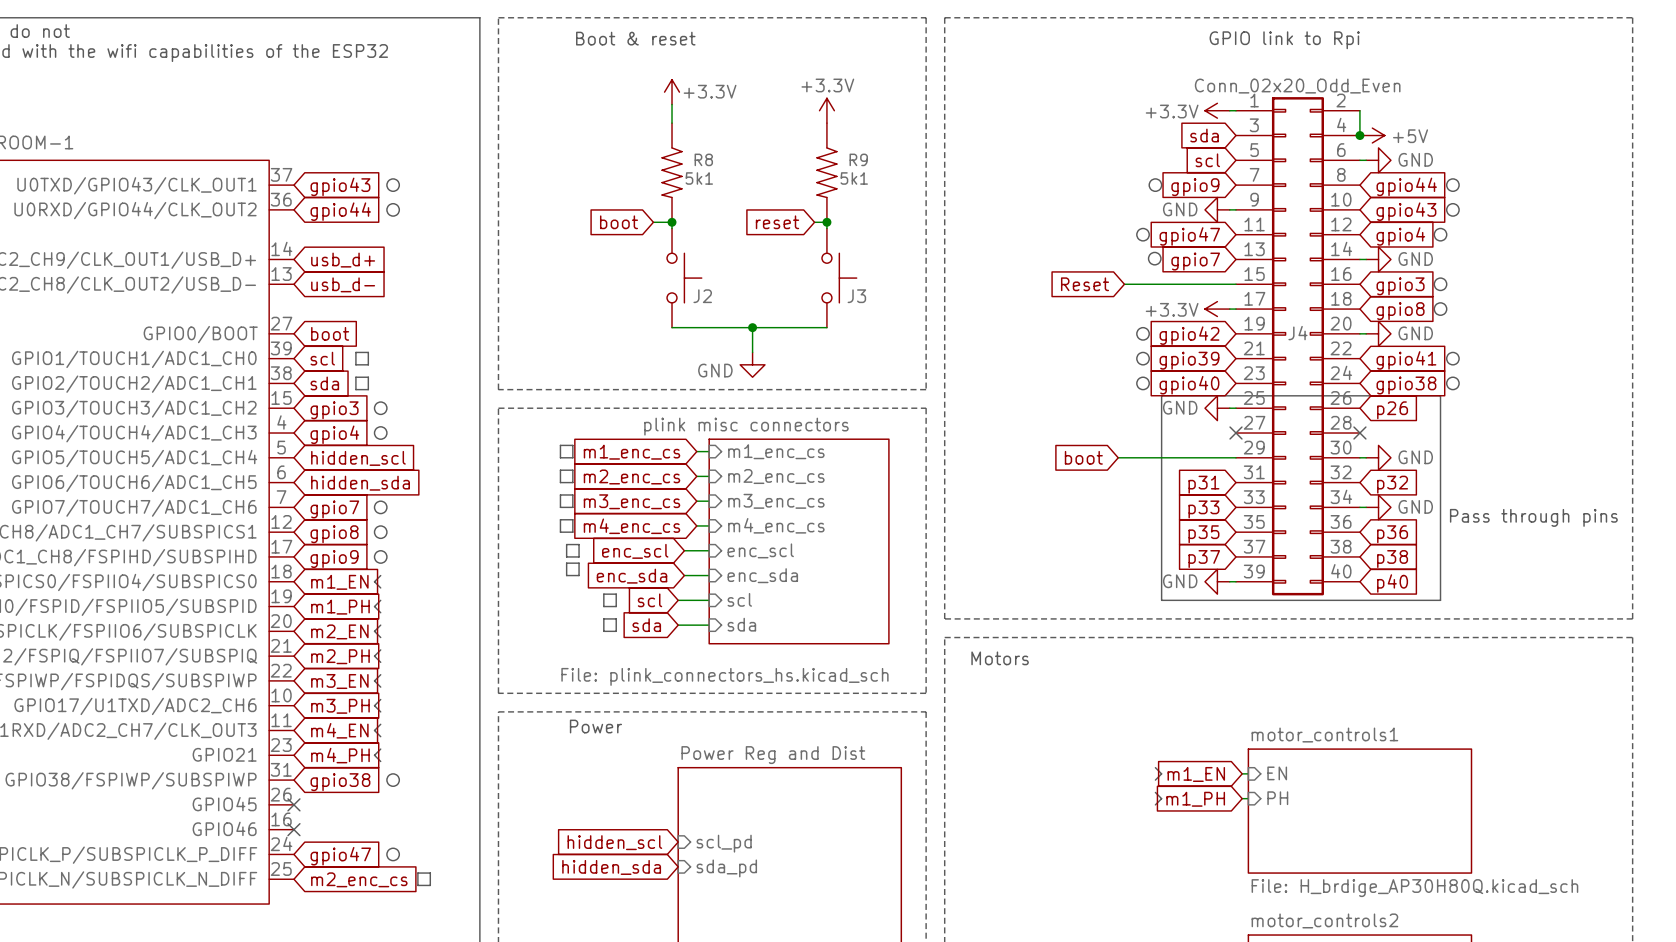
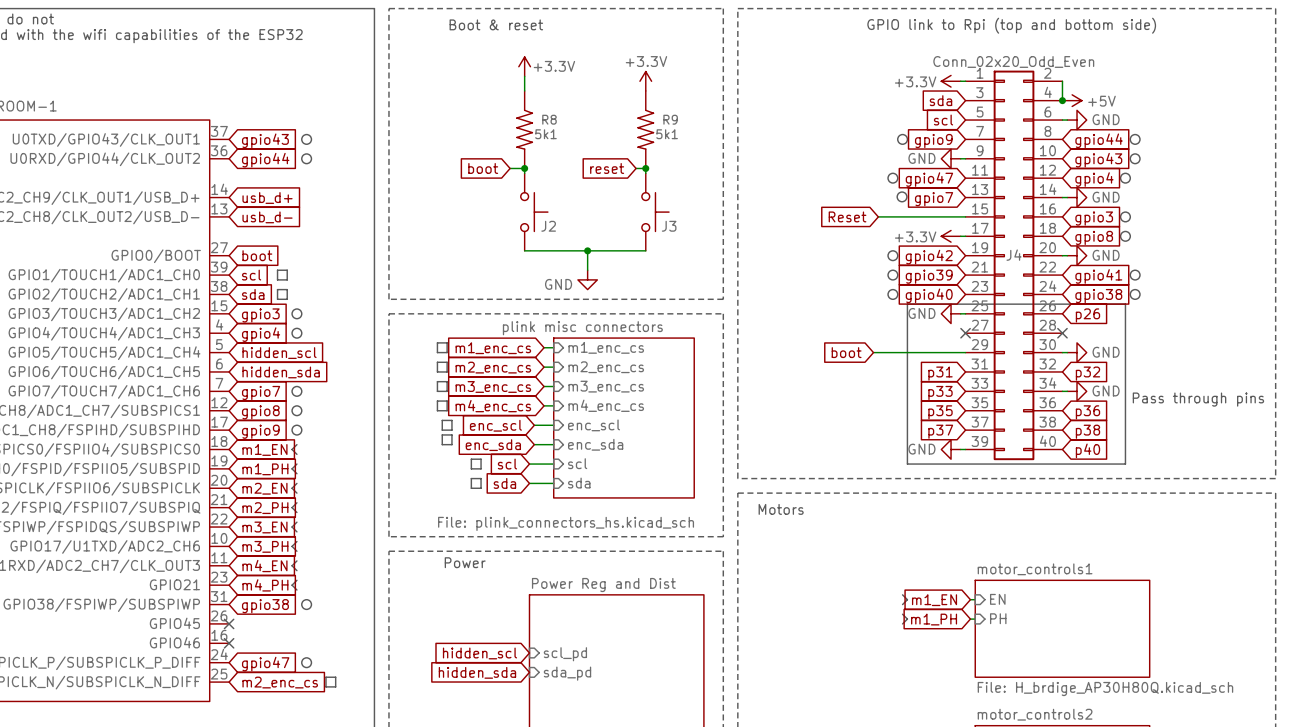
text: none -> GPIO link to Rpi (top and bottom side) (1011, 25)
text: GPIO link to Rpi (1284, 40) -> none

